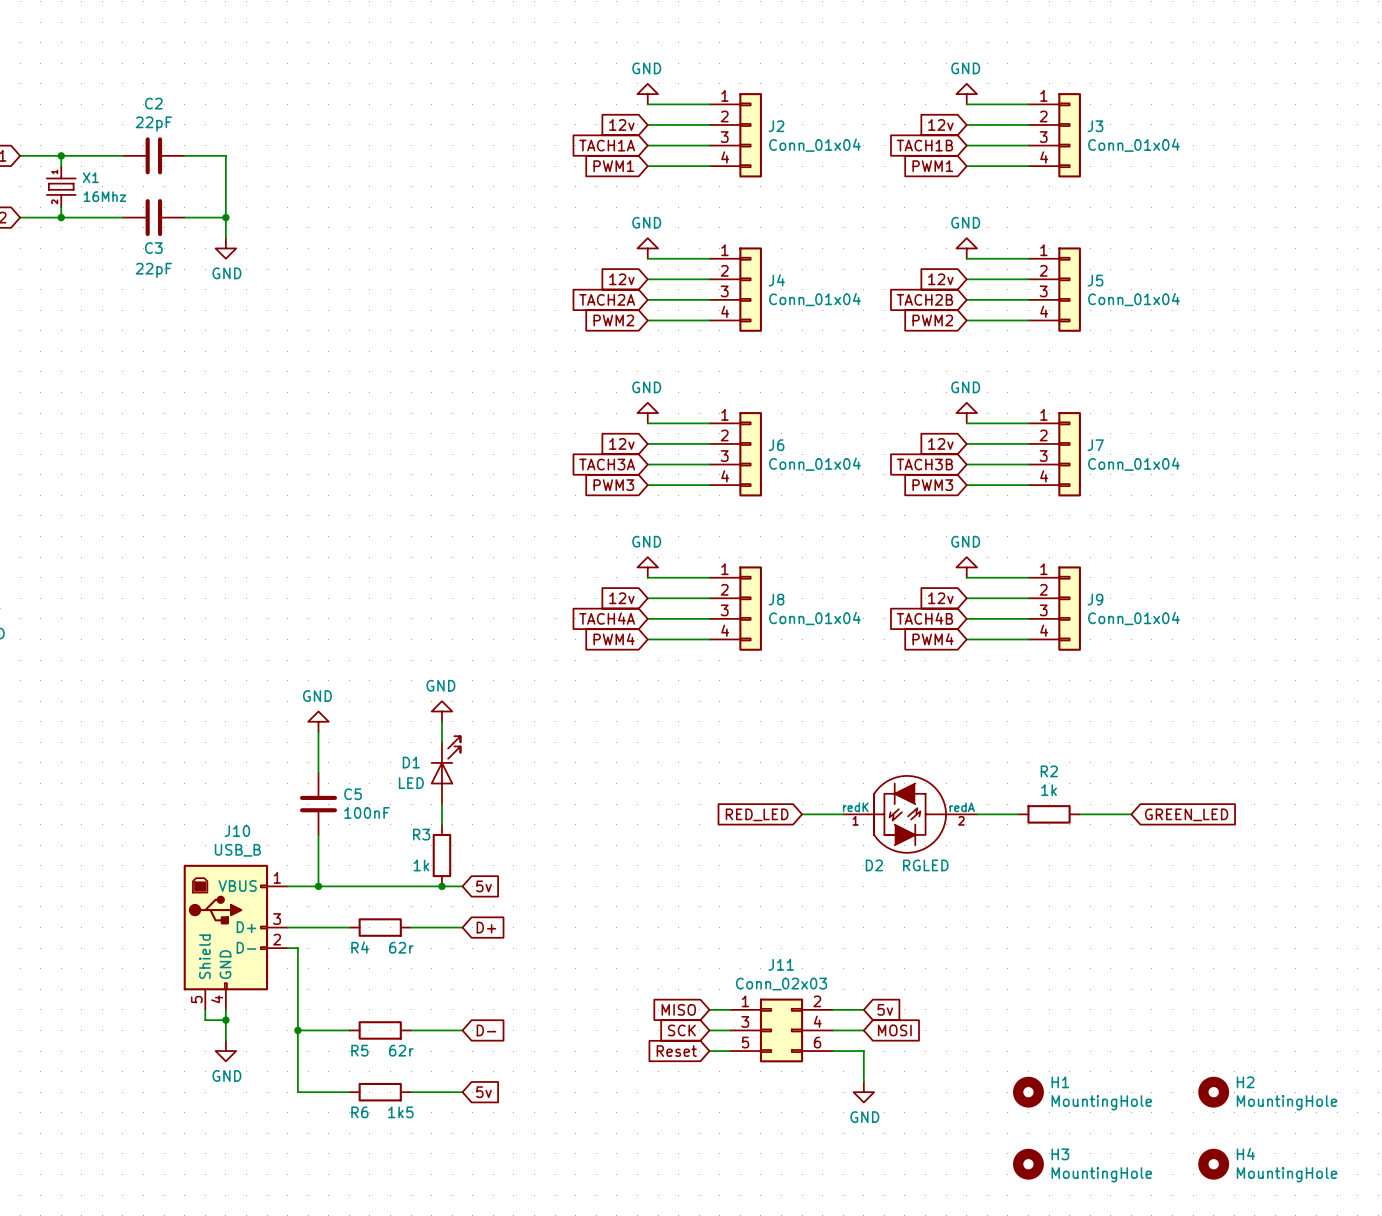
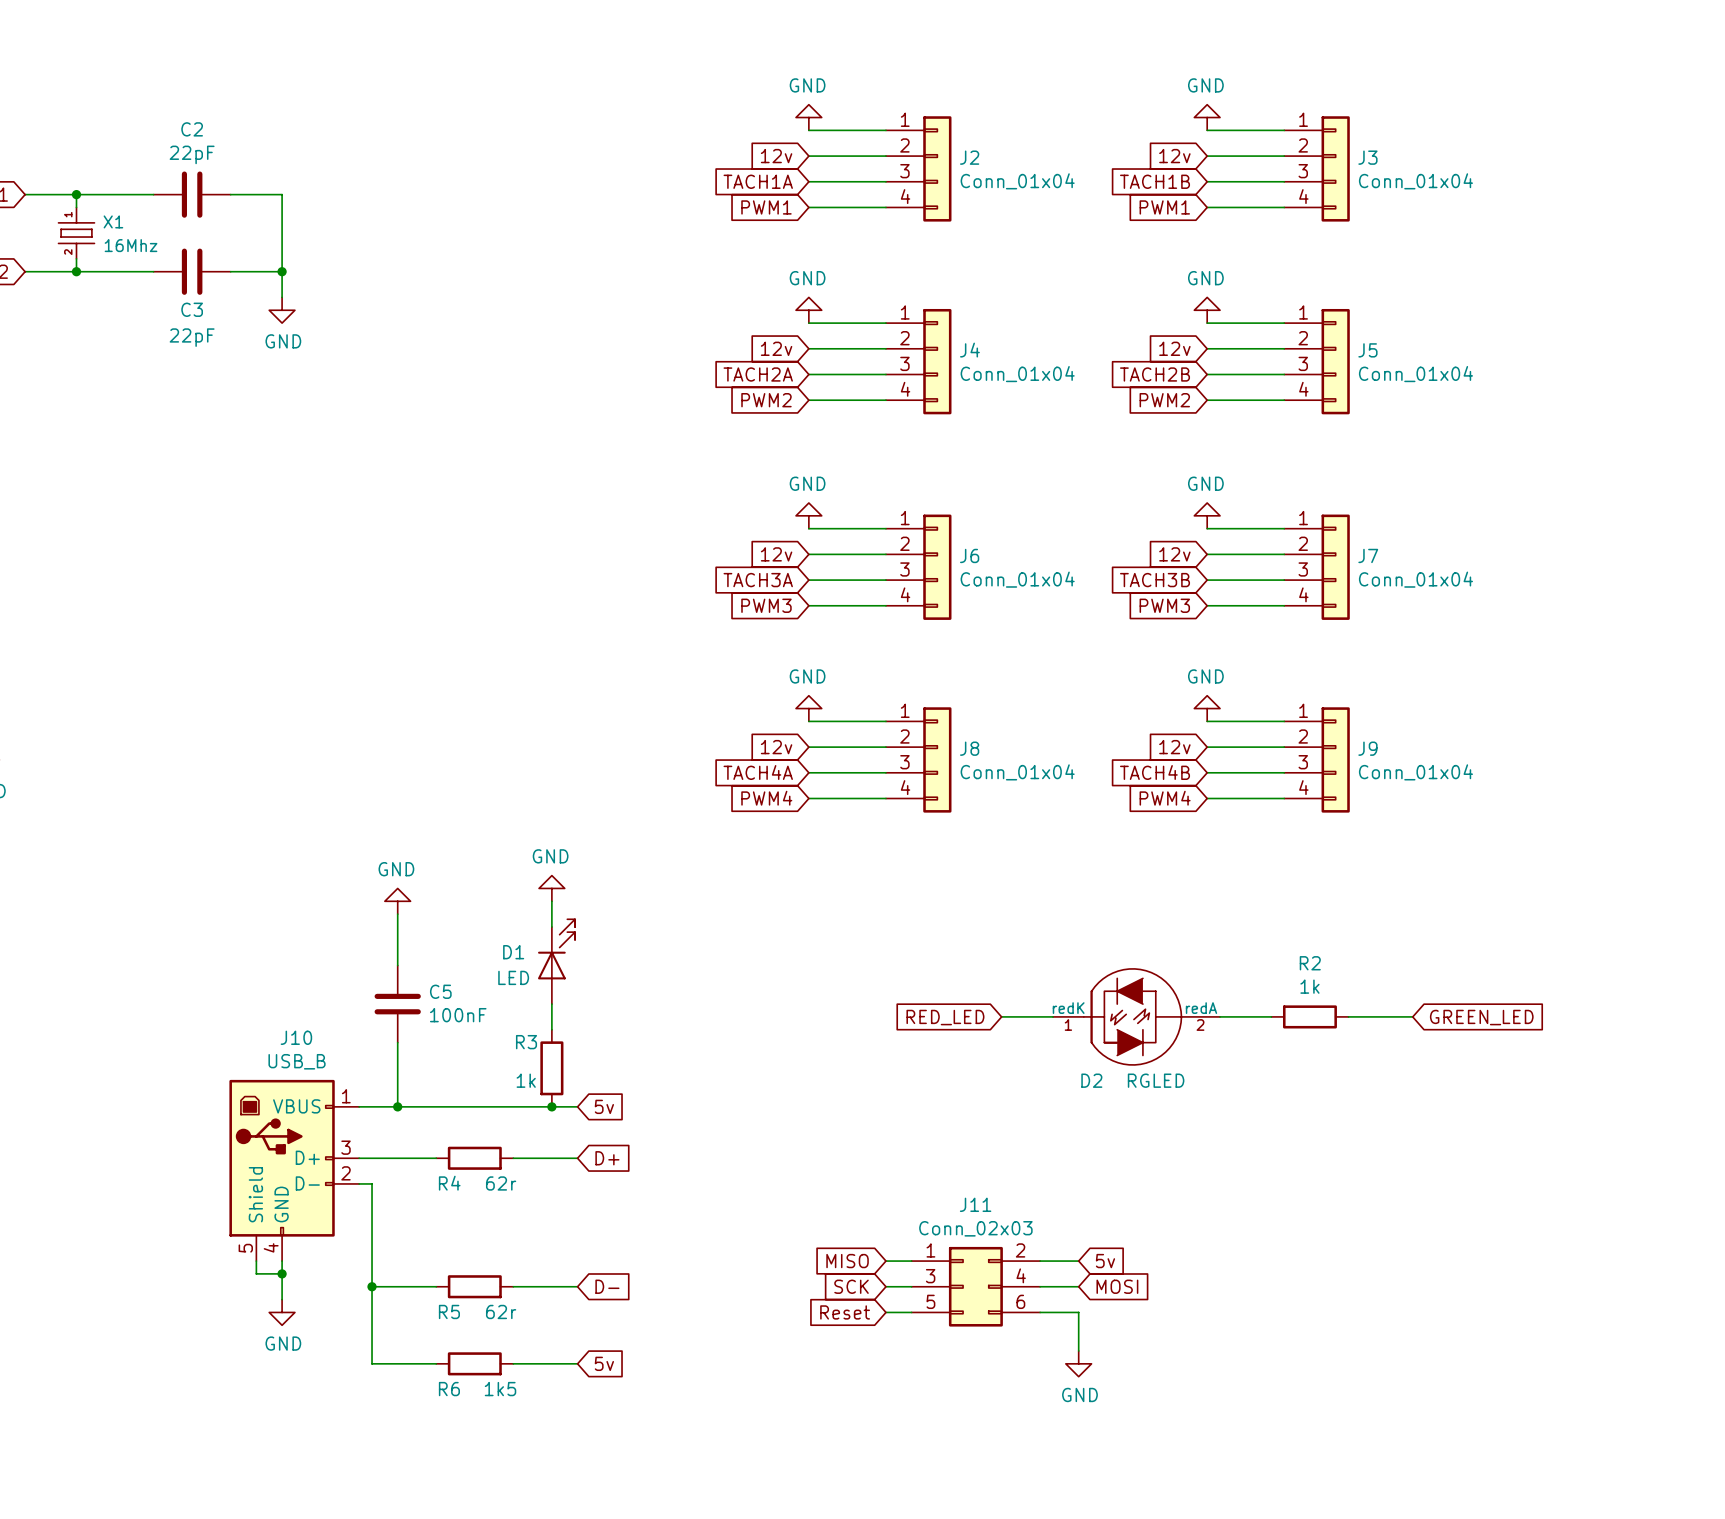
H1: MountingHole (1028, 1092) -> none
H2: MountingHole (1213, 1092) -> none
H3: MountingHole (1028, 1164) -> none
H4: MountingHole (1213, 1164) -> none

